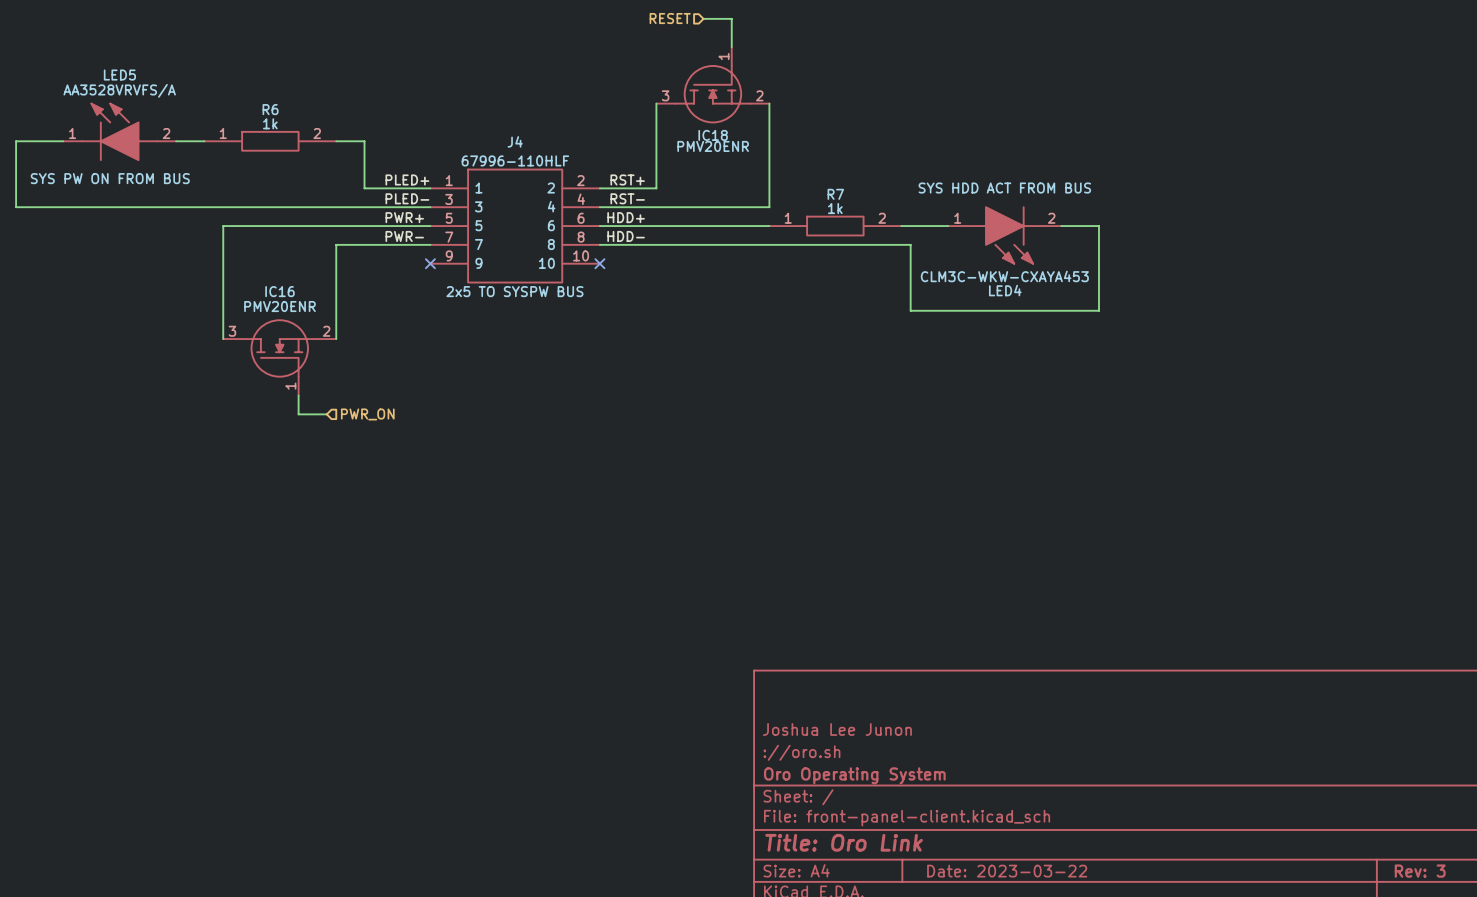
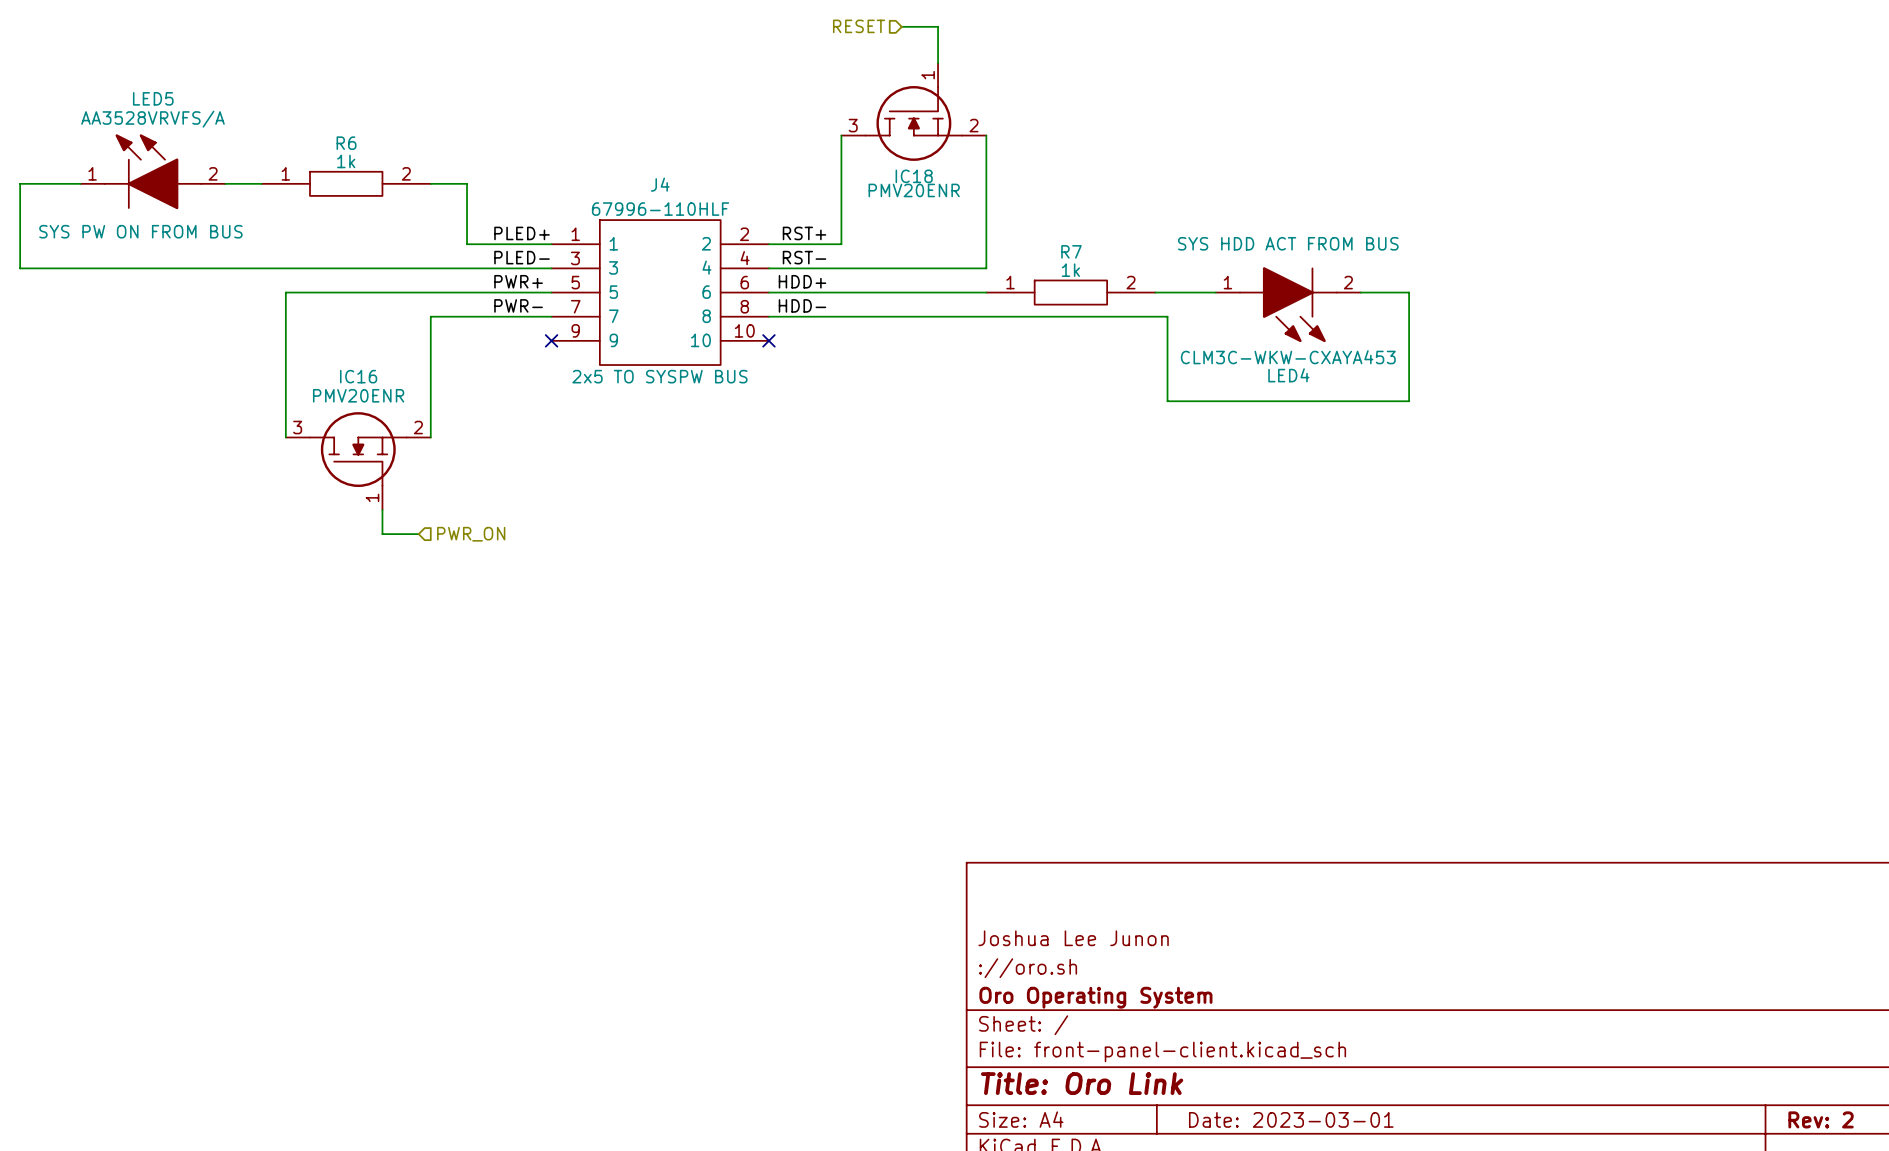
title block: Date: 2023-03-22 (1007, 871) -> Date: 2023-03-01 (1291, 1119)
title block: Rev: 3 (1420, 871) -> Rev: 2 (1821, 1119)

